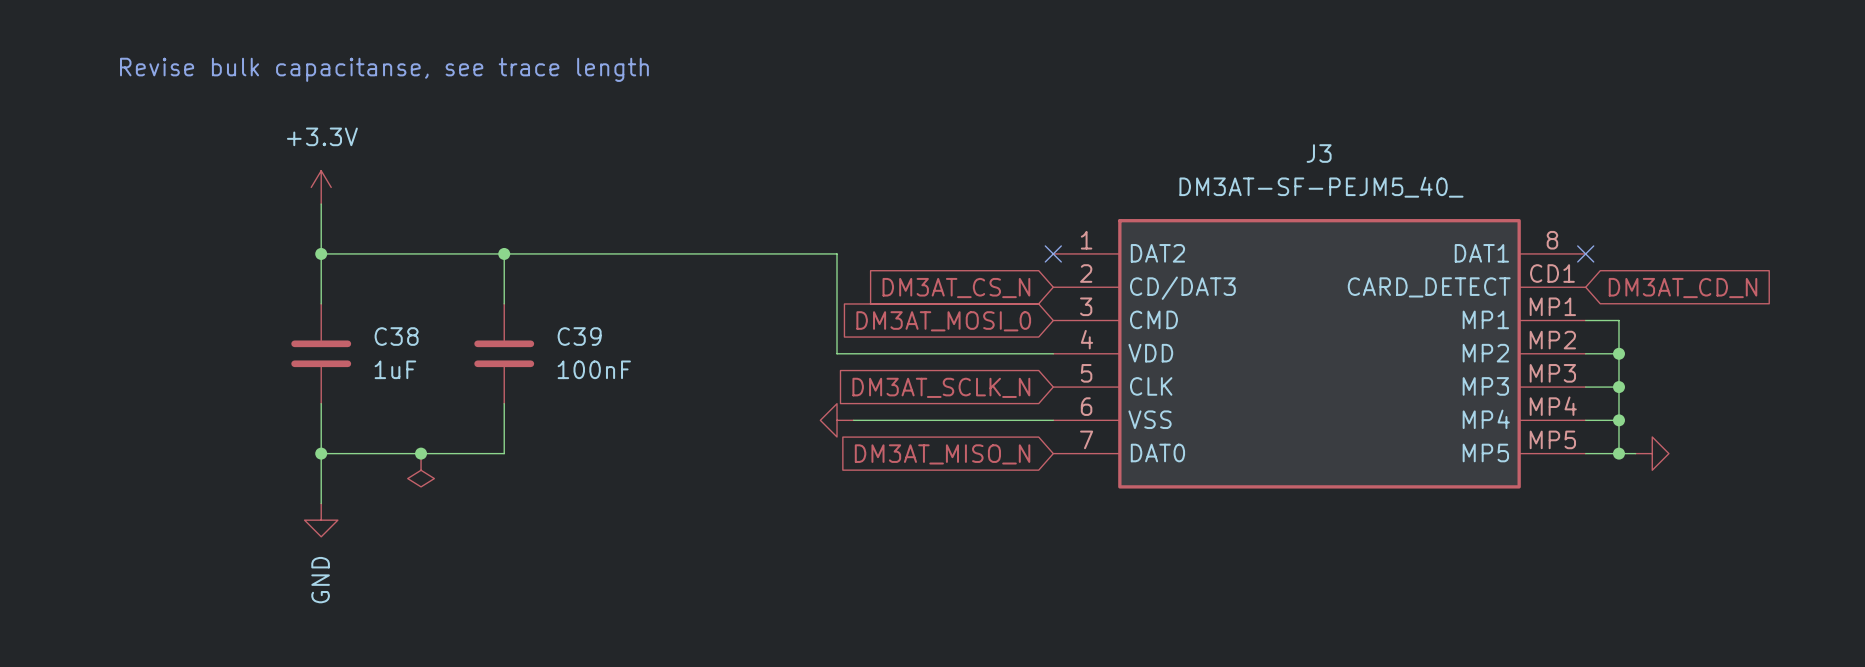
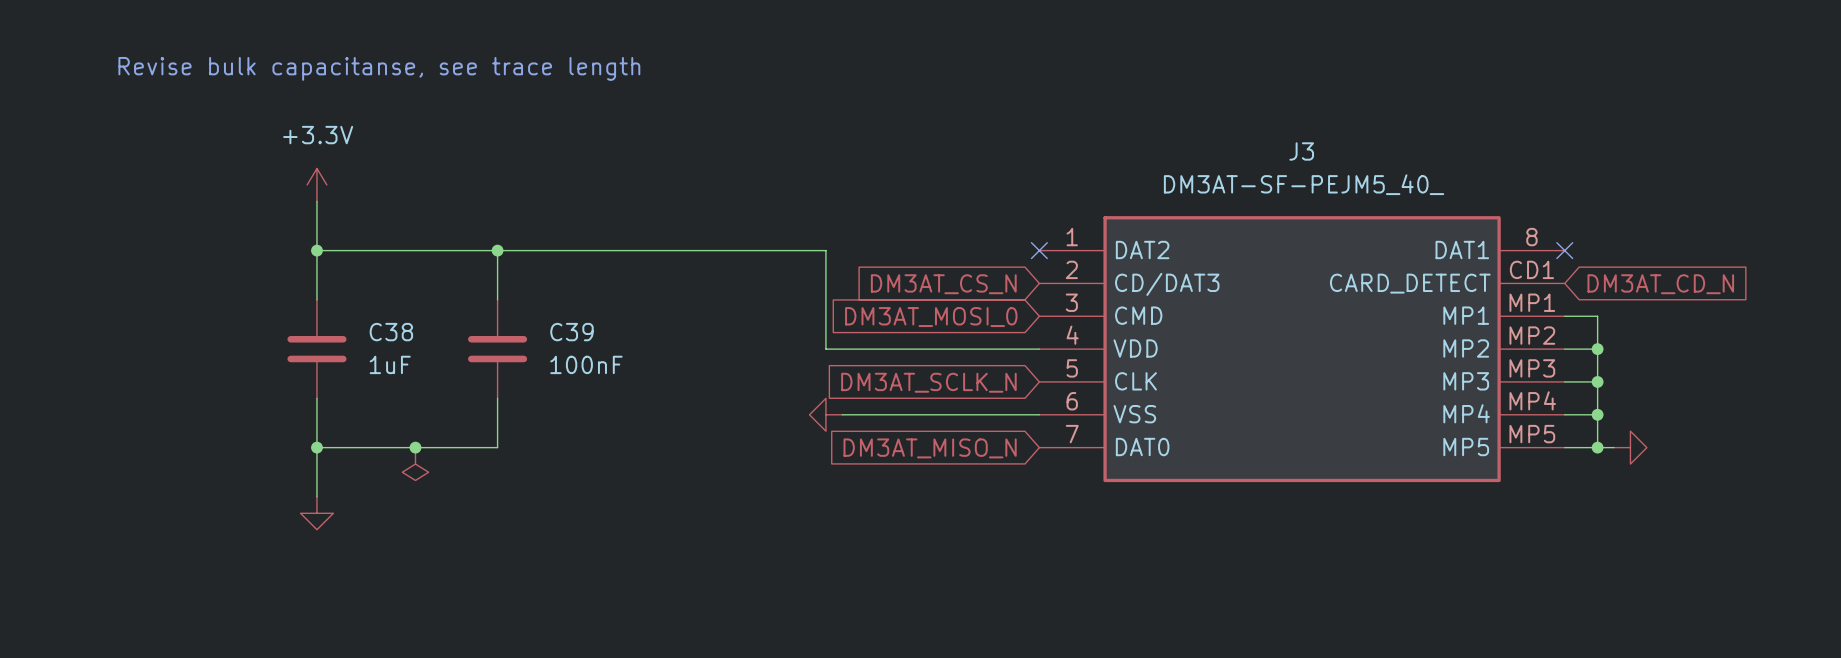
power symbol text: GND (320, 580) -> none

